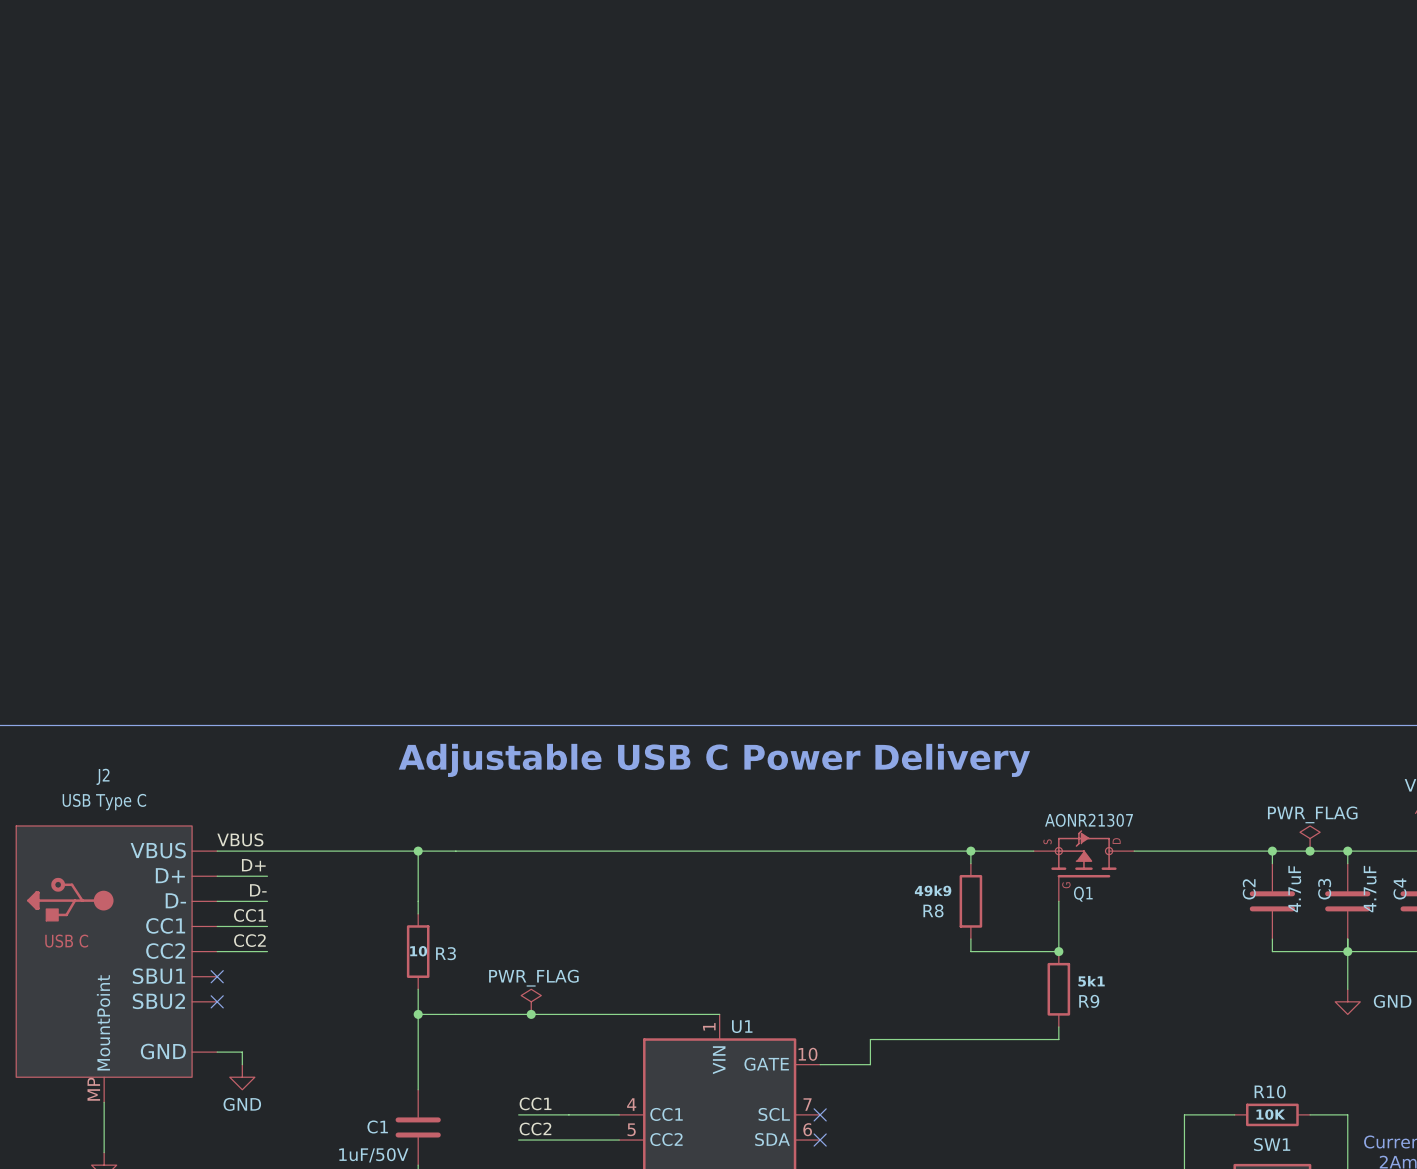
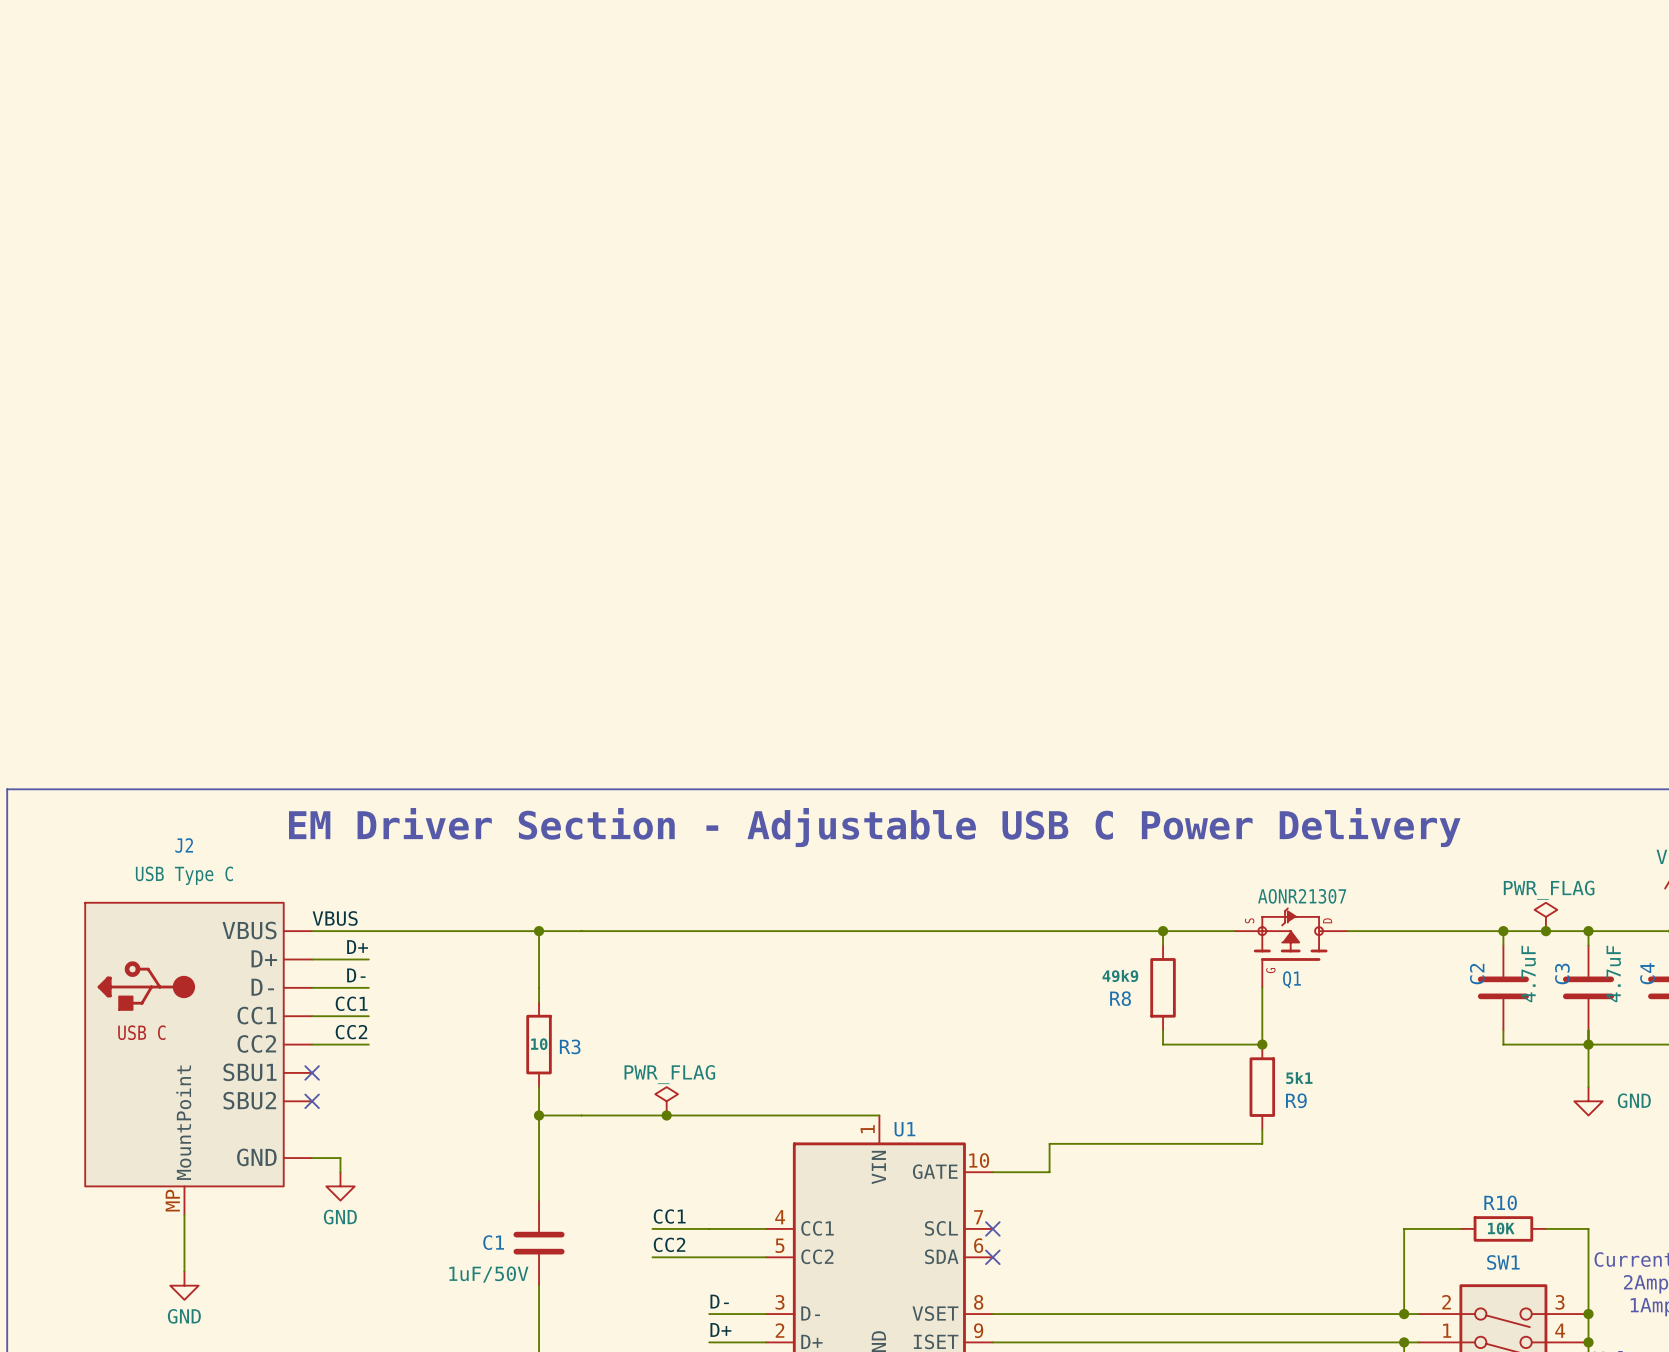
text: Adjustable USB C Power Delivery (714, 760) -> EM Driver Section - Adjustable USB C Power Delivery (874, 827)

